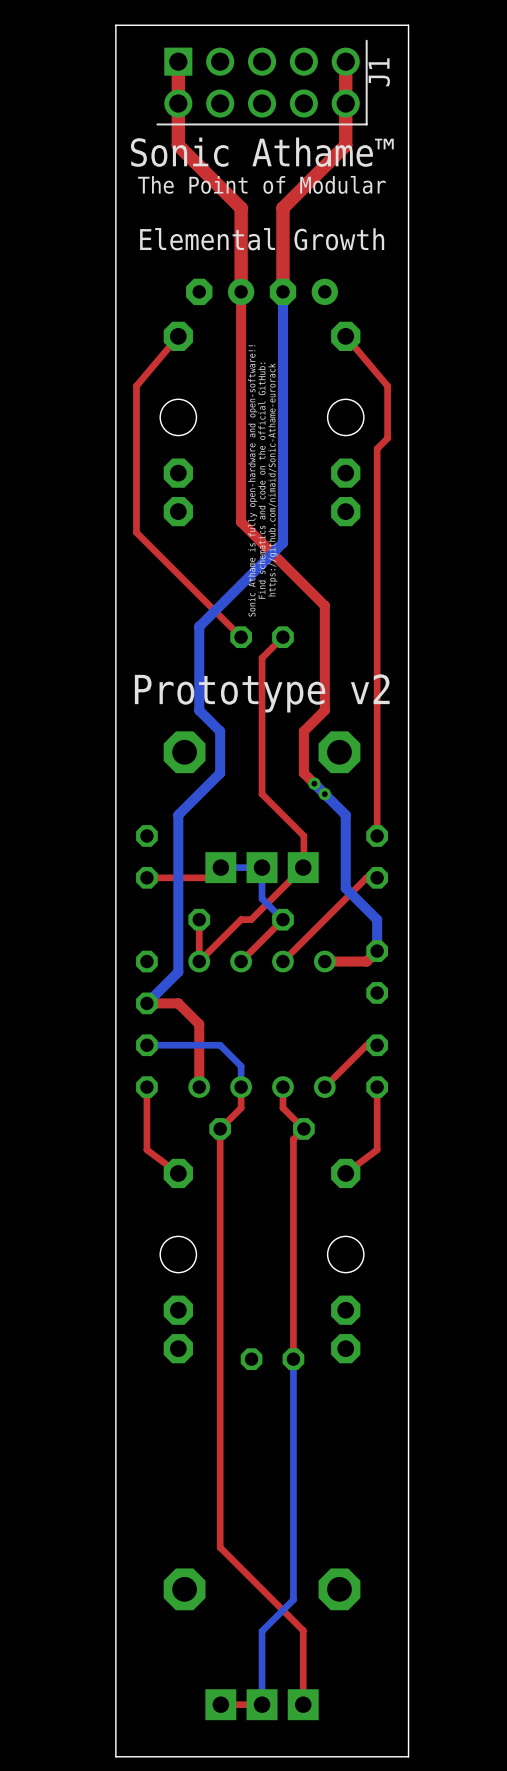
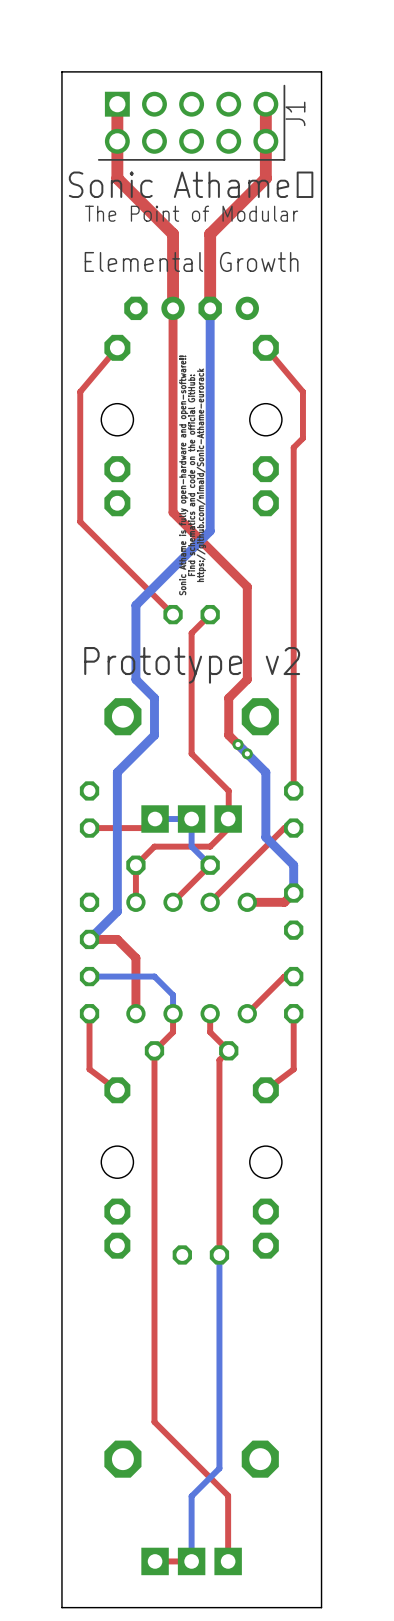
top track: (303, 867) (251, 919) (241, 919) (199, 961) -> (228, 819) (228, 828) (210, 846) (154, 846) (135, 865)

